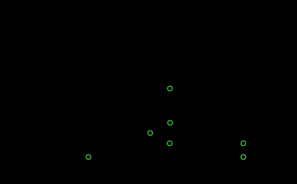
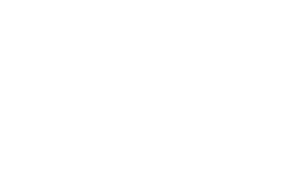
via: (169, 88) -> none
via: (170, 122) -> none
via: (150, 133) -> none
via: (169, 143) -> none
via: (243, 143) -> none
via: (88, 157) -> none
via: (243, 157) -> none

